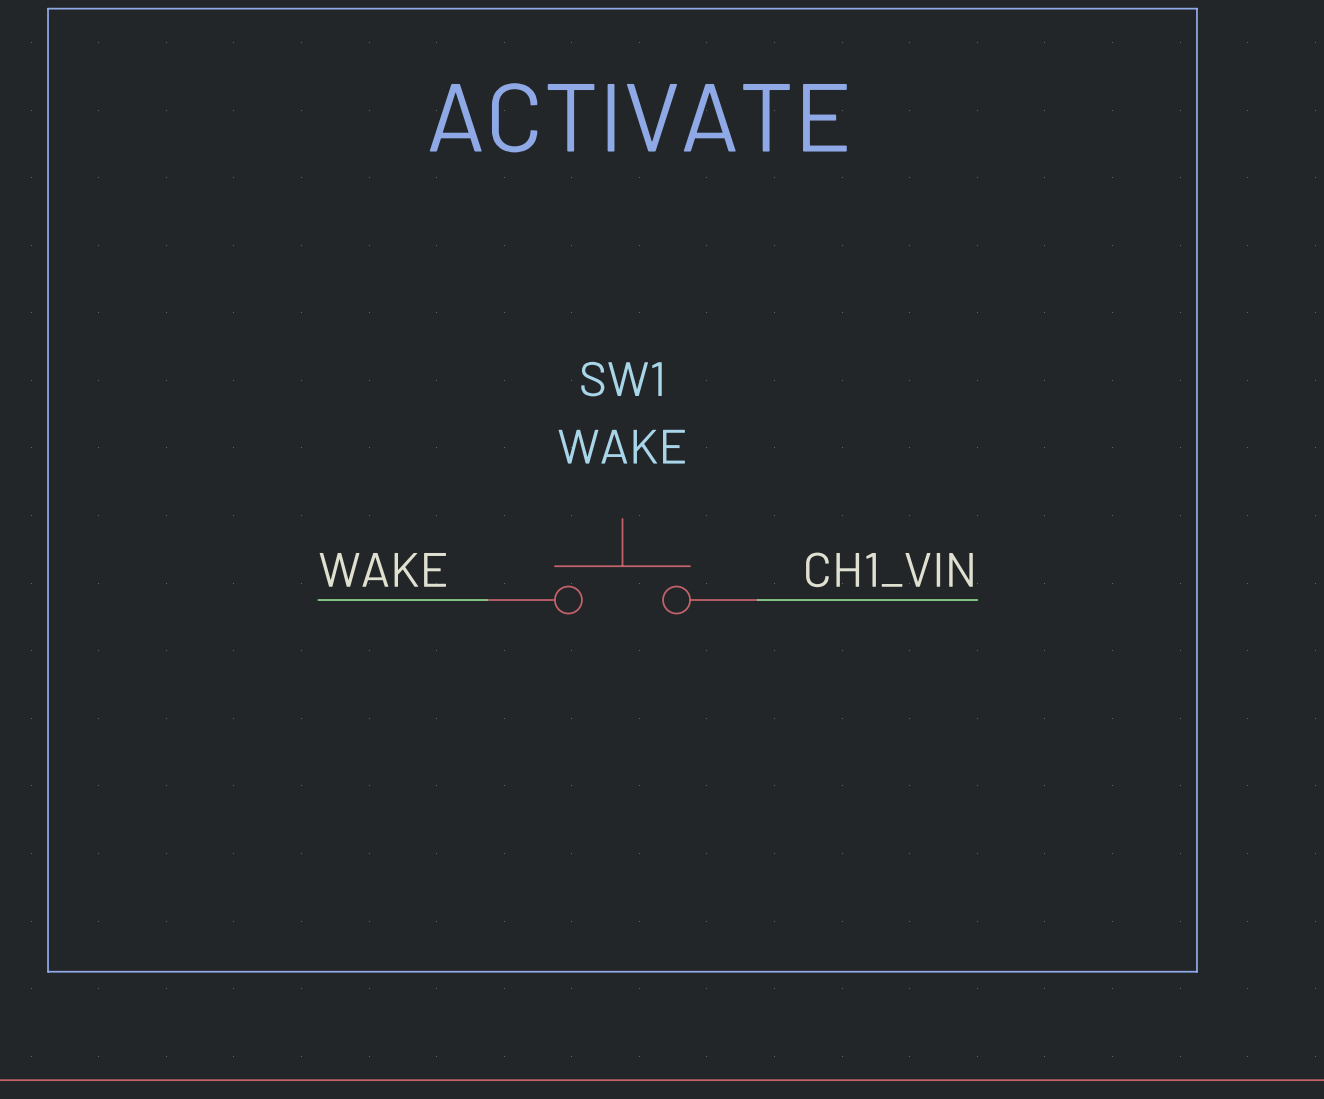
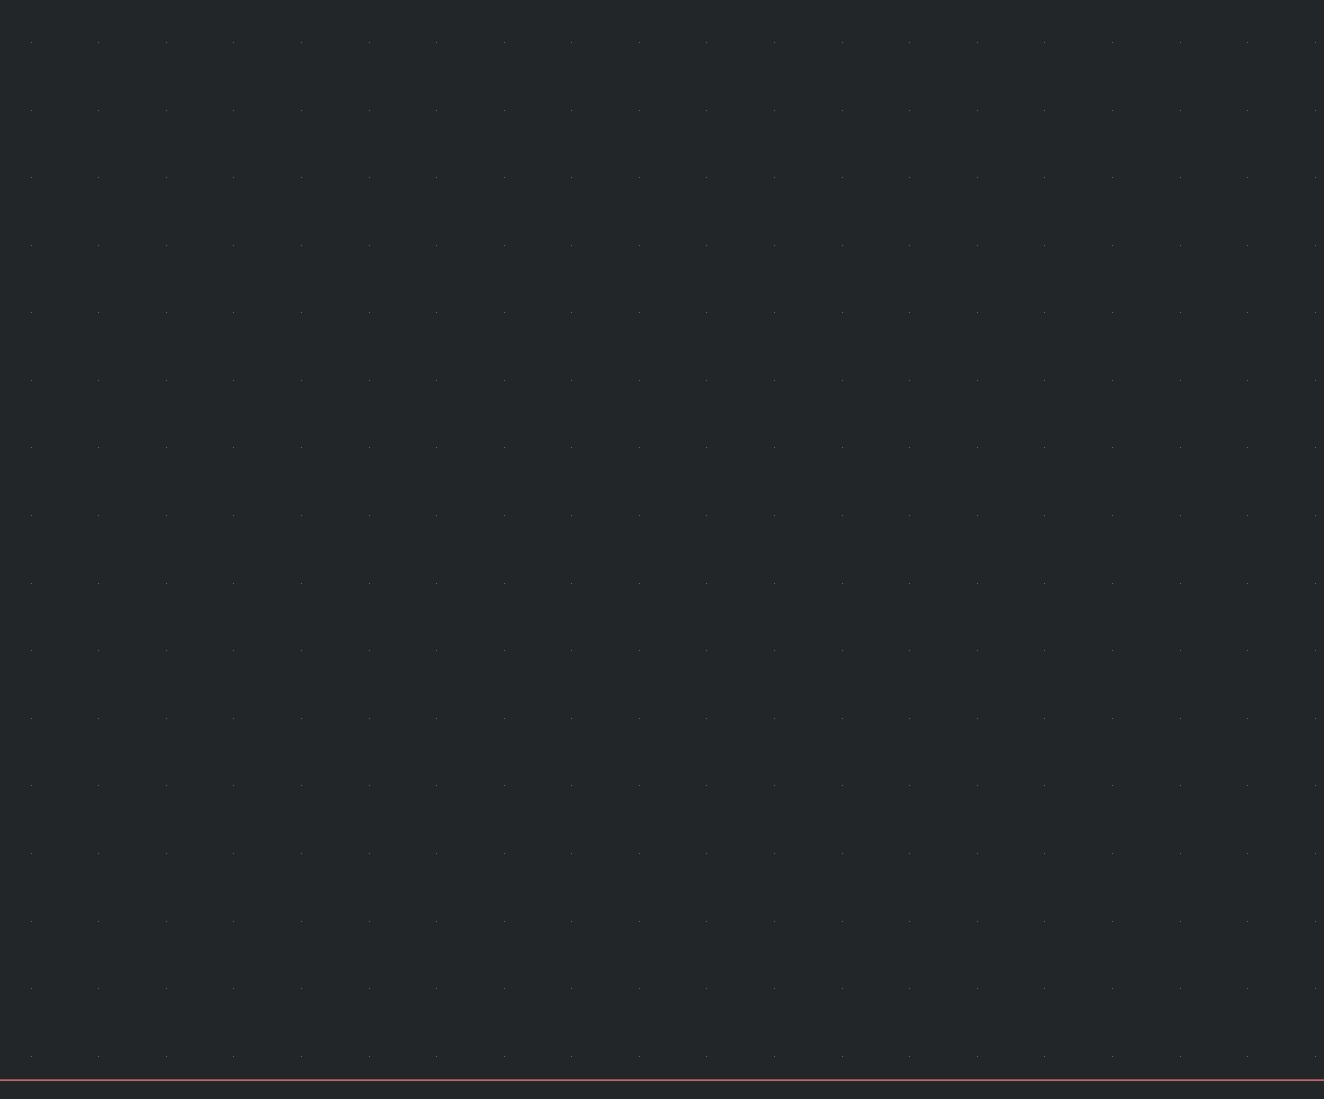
line: (48, 8) (1196, 8) (1196, 971) (48, 971) (48, 8) -> none
text: ACTIVATE (638, 117) -> none
SW1: WAKE (622, 566) -> none
label: WAKE (382, 569) -> none
label: CH1_VIN (889, 569) -> none
wire: (318, 600) (487, 600) -> none
wire: (757, 600) (977, 600) -> none

